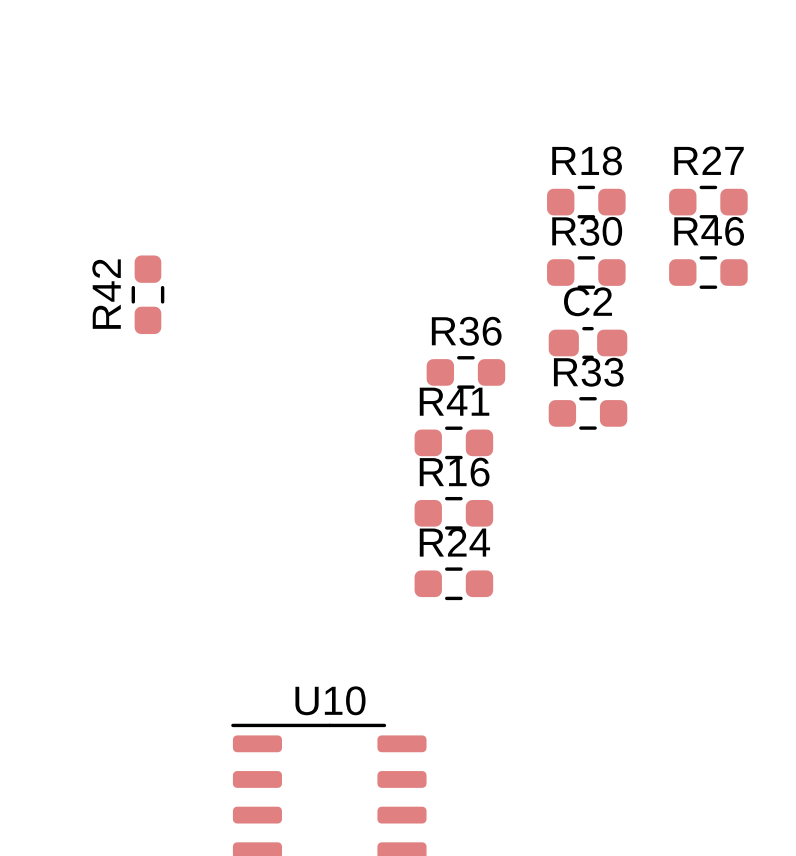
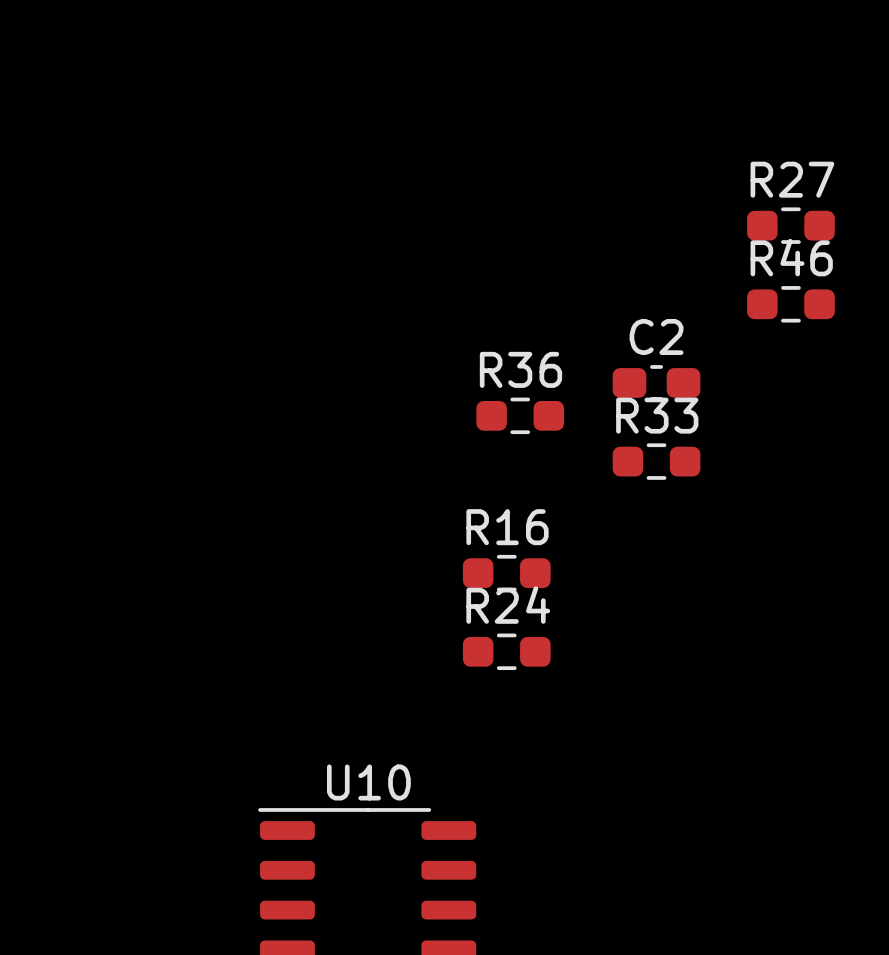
R18: (586, 202) -> none
R30: (586, 272) -> none
R42: (147, 294) -> none
R41: (453, 442) -> none

